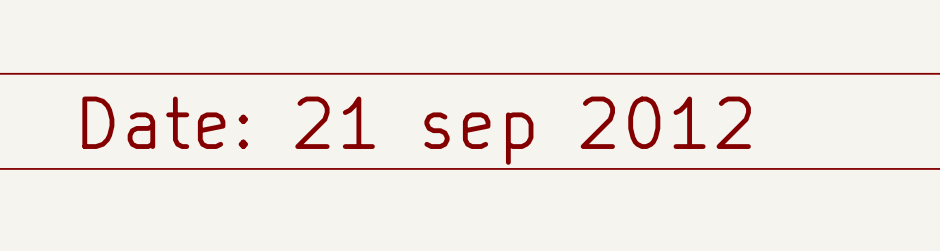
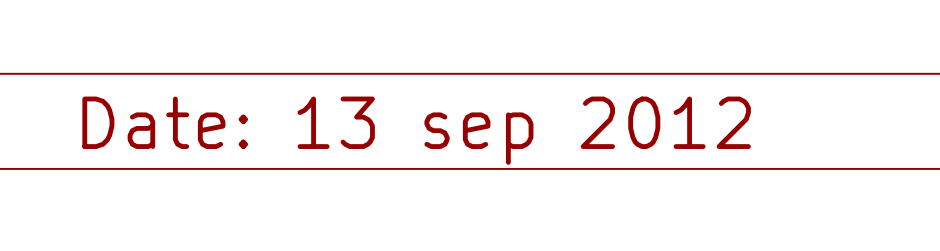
title block: Date: 21 sep 2012 (416, 130) -> Date: 13 sep 2012 (416, 130)

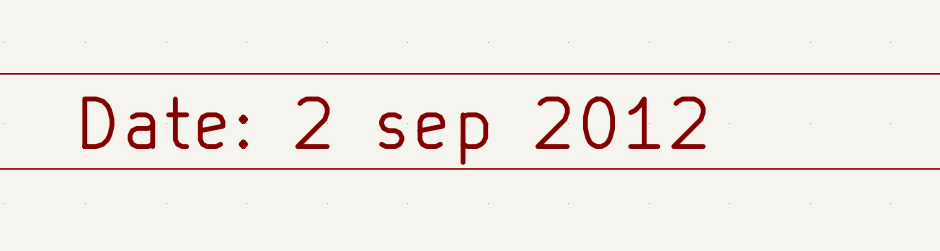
title block: Date: 13 sep 2012 (416, 130) -> Date: 2 sep 2012 (393, 130)

